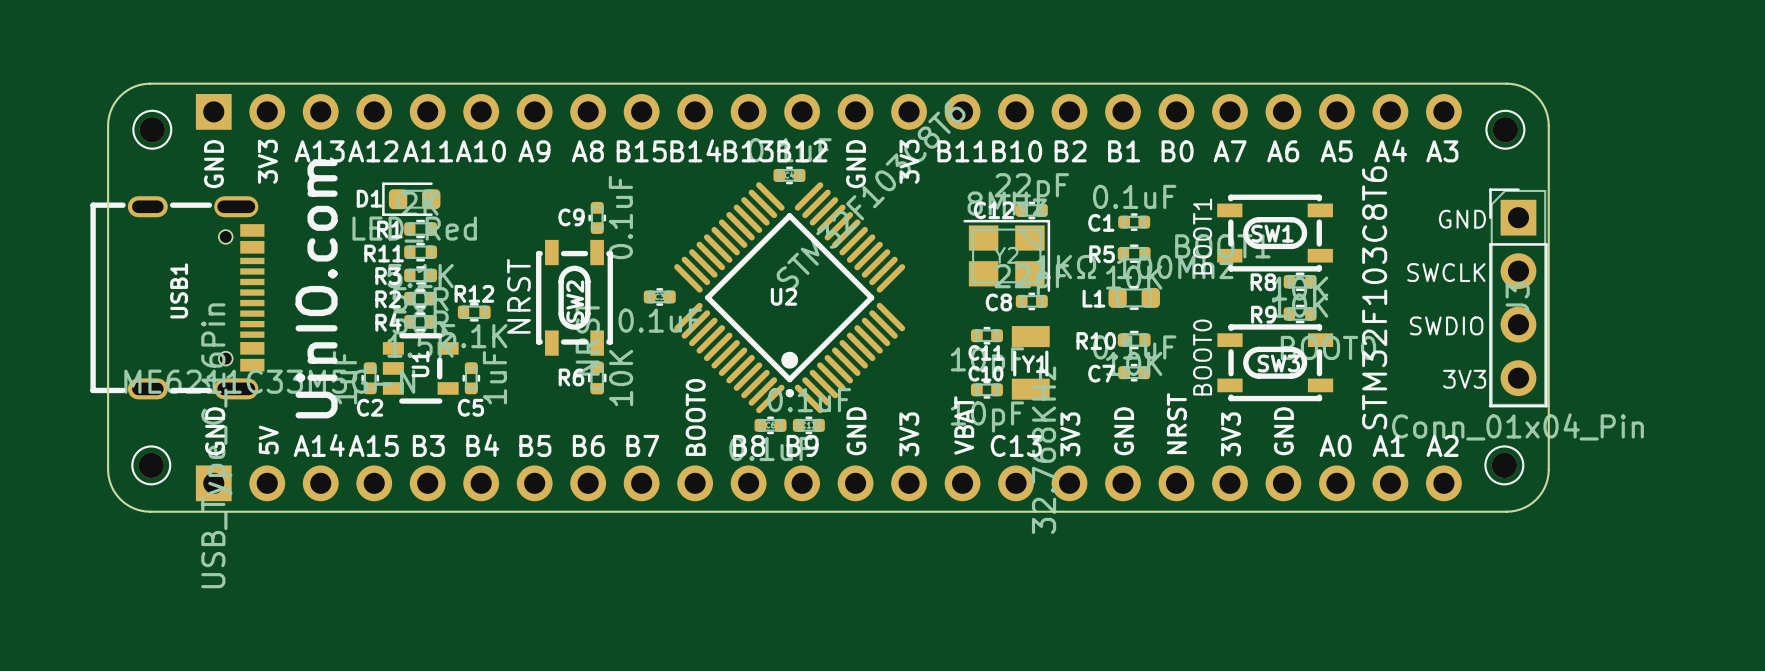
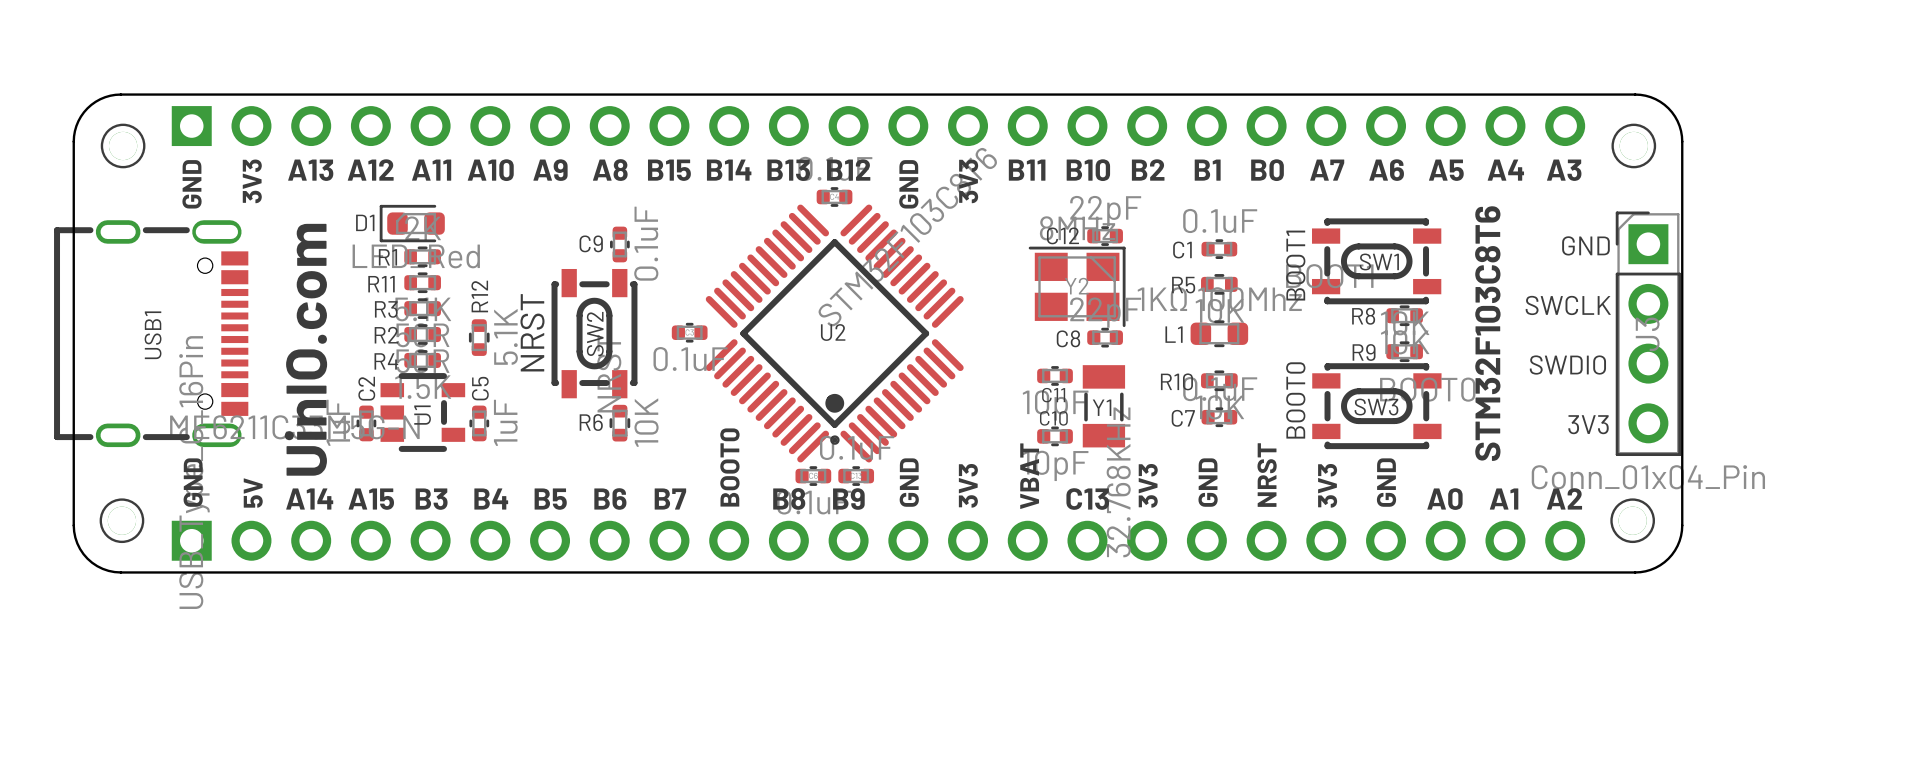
R12 rotation: 0° (474, 312) -> 90° clockwise (479, 337)
C2 name rotation: 0° (370, 407) -> 90° counterclockwise (366, 388)
C2 name position: C2 (370, 407) -> C2 (366, 388)
C5 name rotation: 0° (470, 407) -> 90° counterclockwise (480, 388)
C5 name position: C5 (470, 407) -> C5 (480, 388)

